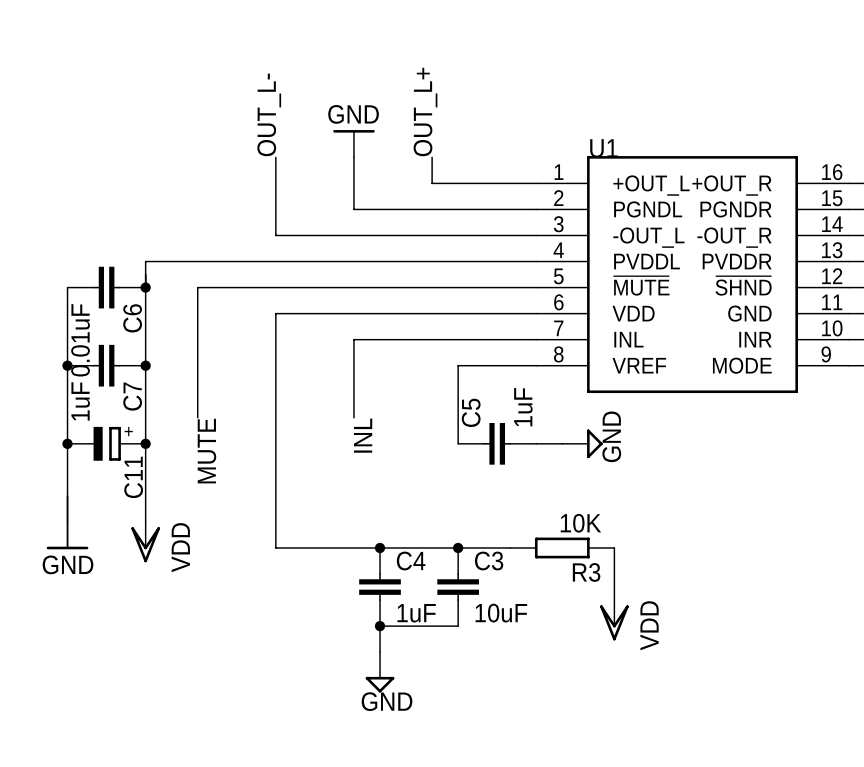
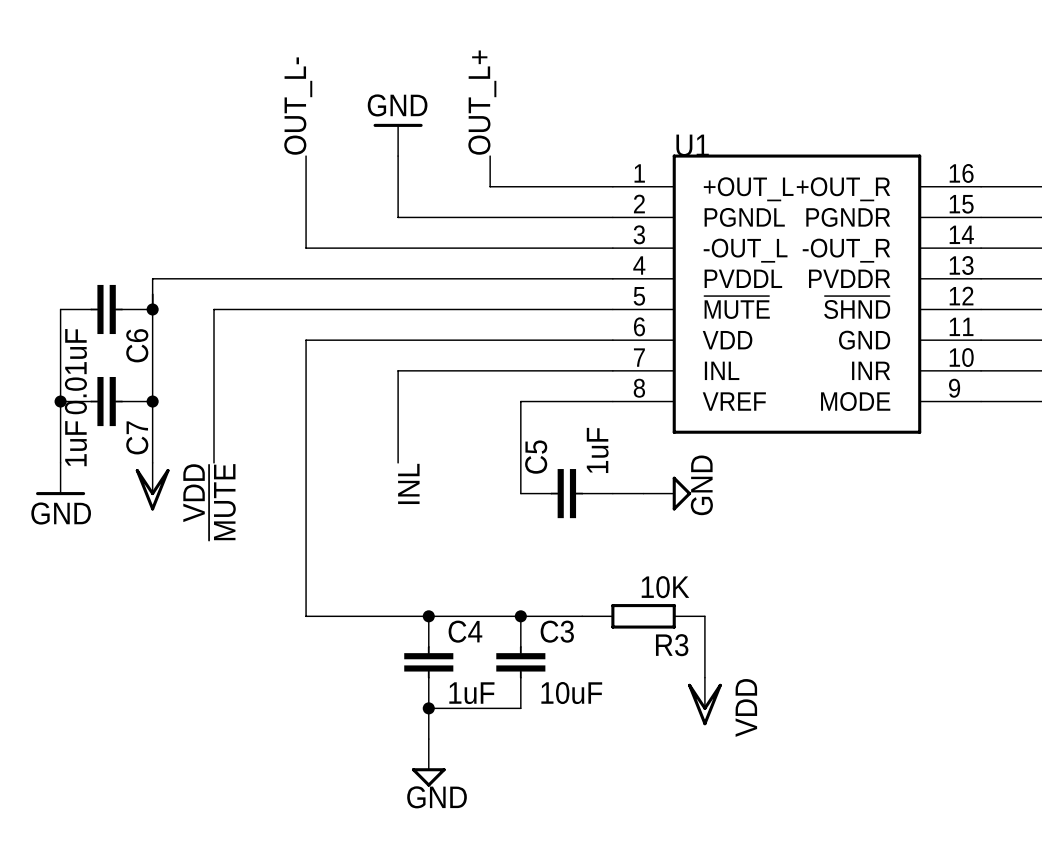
wire: (67, 417) (67, 547) -> none
wire: (145, 417) (145, 521) -> none
junction: (67, 443) -> none
C11: (106, 443) -> none
junction: (145, 443) -> none
label: MUTE (206, 451) -> ~{MUTE} (222, 502)
power symbol position: GND (67, 535) -> GND (60, 479)
power symbol position: VDD (145, 542) -> VDD (152, 486)

